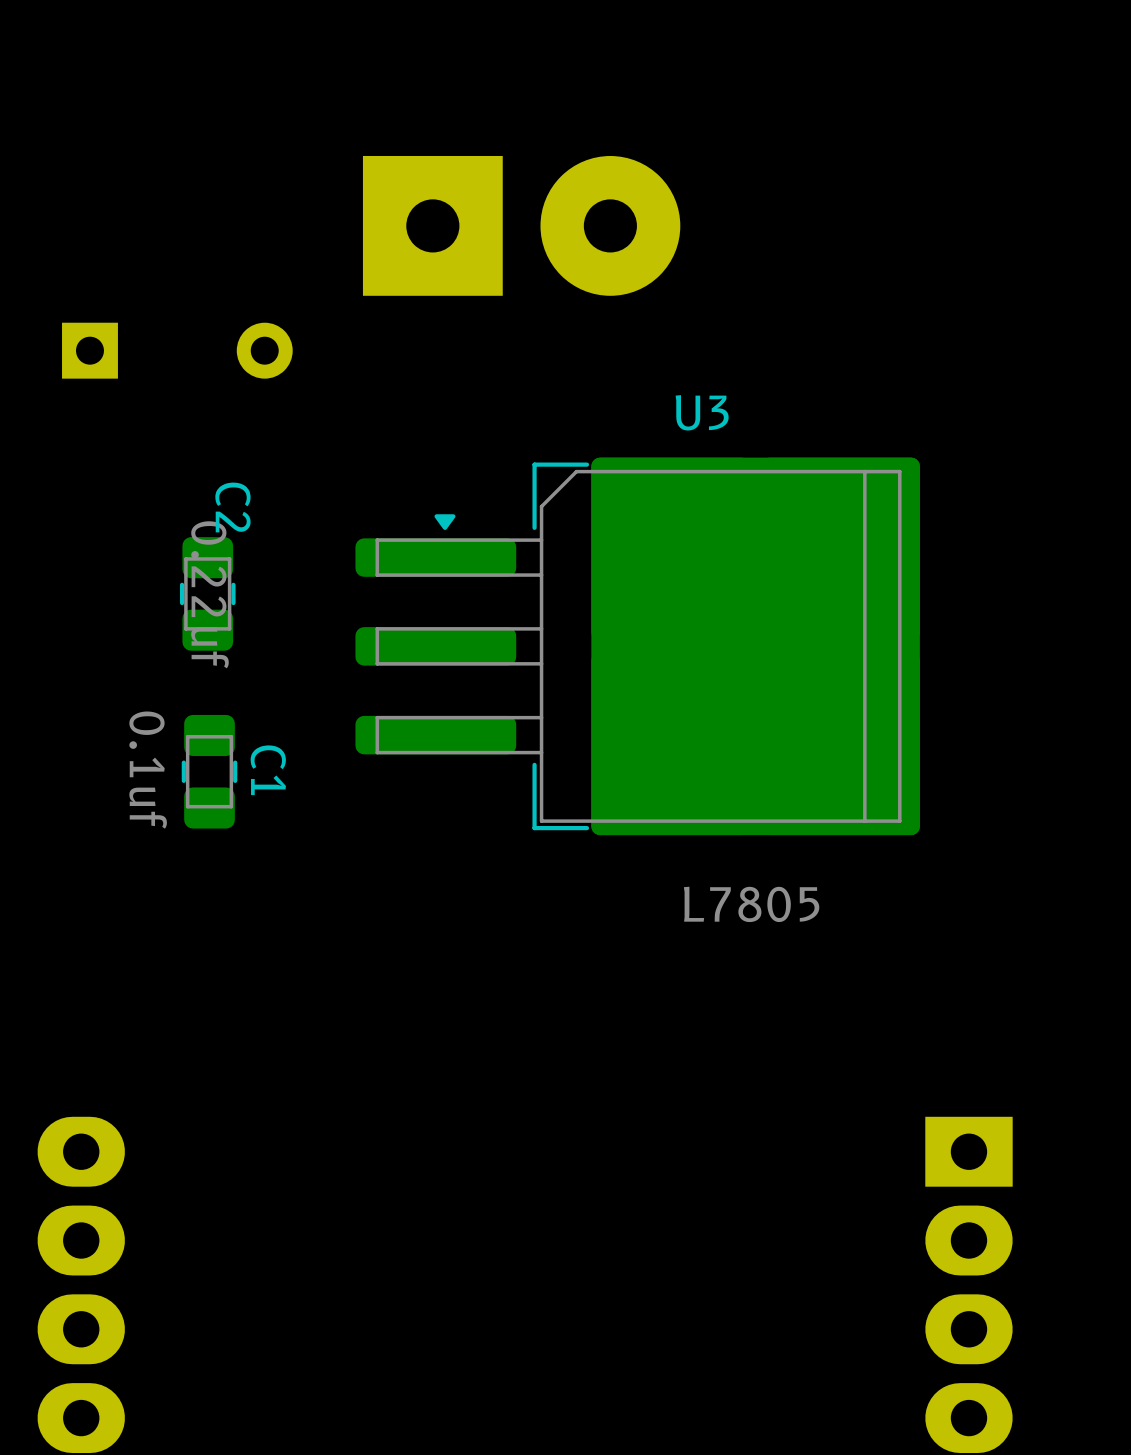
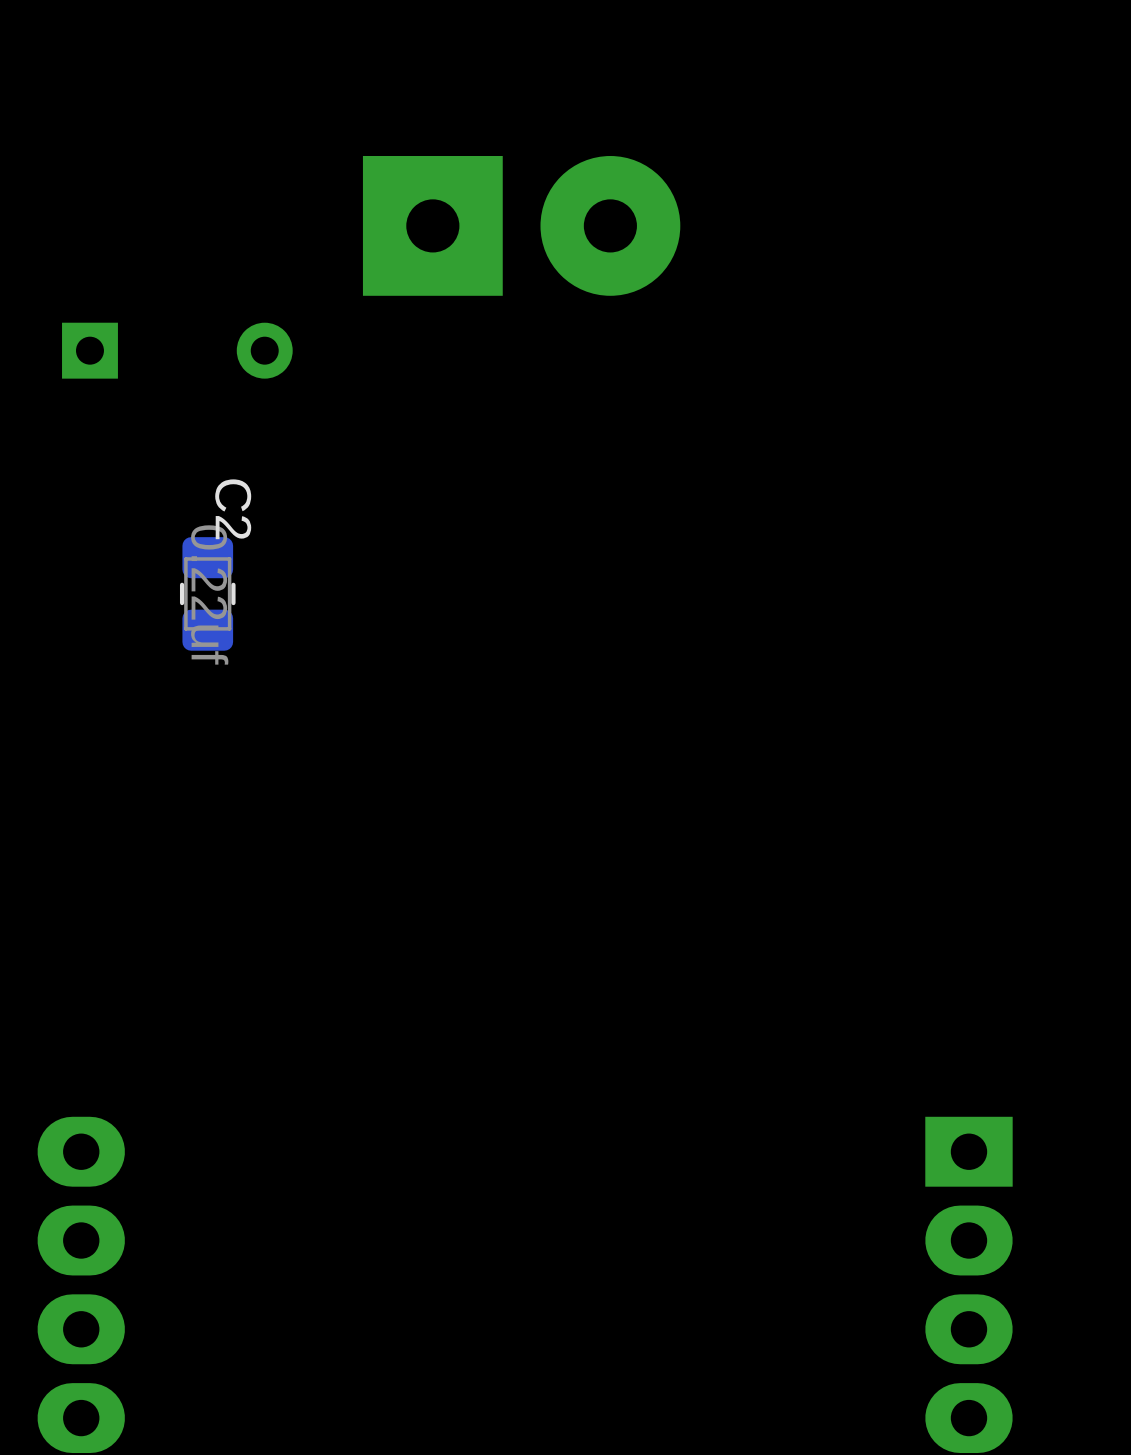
U3: L7805 (637, 646) -> none
C1: 0.1uf (209, 771) -> none

